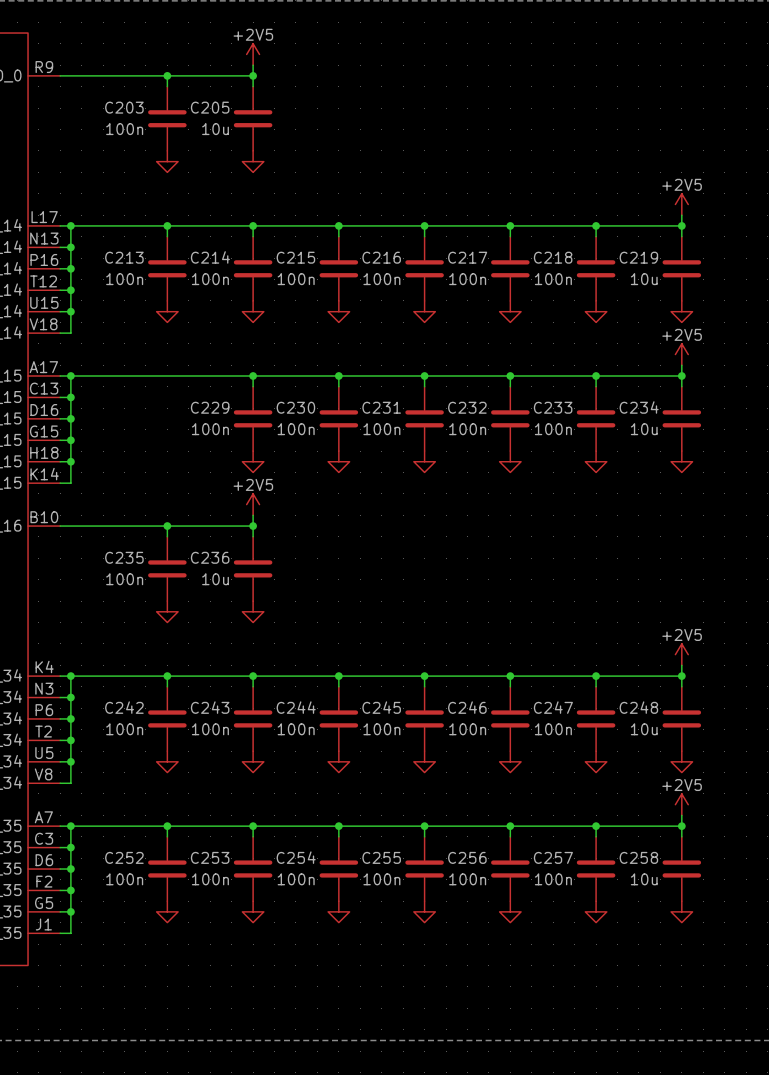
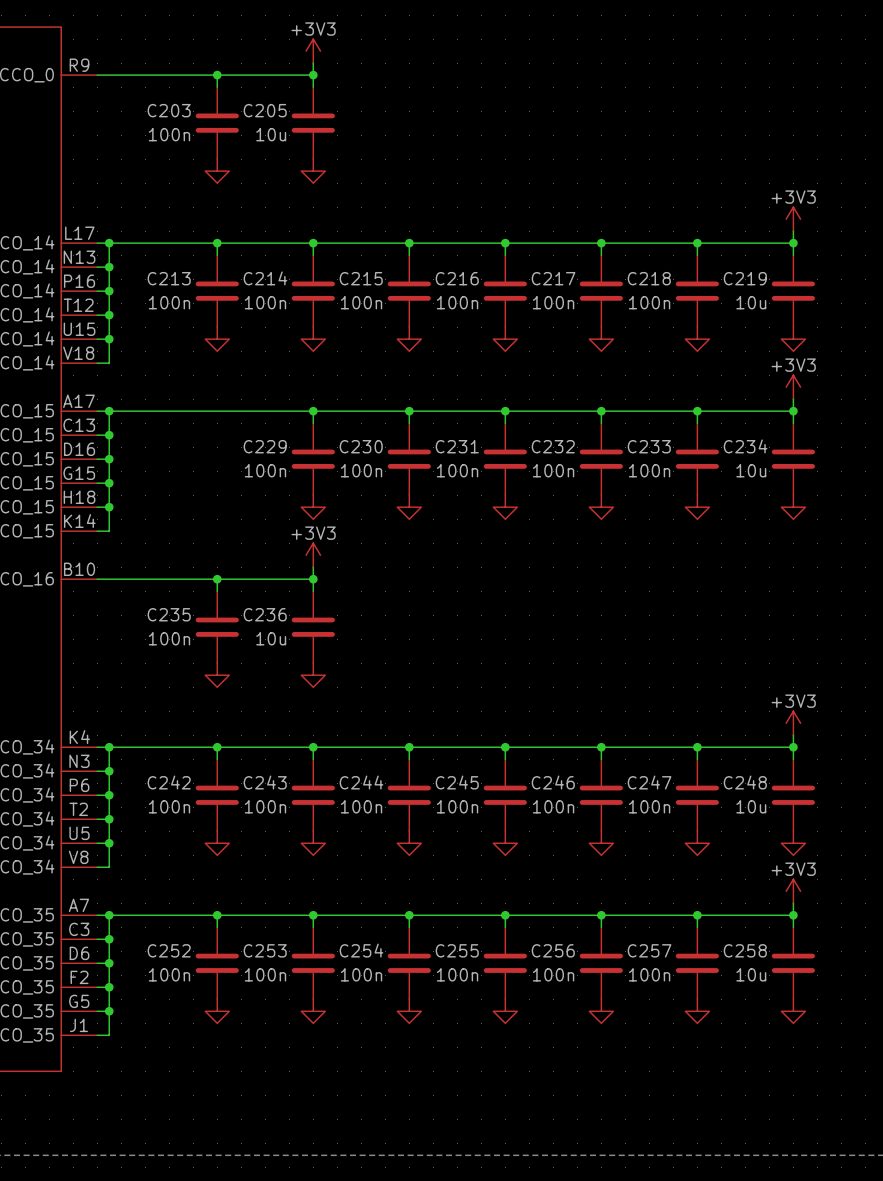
power symbol: +2V5 (253, 54) -> +3V3 (313, 51)
power symbol: +2V5 (681, 204) -> +3V3 (793, 219)
power symbol: +2V5 (681, 354) -> +3V3 (793, 387)
power symbol: +2V5 (253, 504) -> +3V3 (313, 555)
power symbol: +2V5 (681, 654) -> +3V3 (793, 723)
power symbol: +2V5 (681, 804) -> +3V3 (793, 891)

